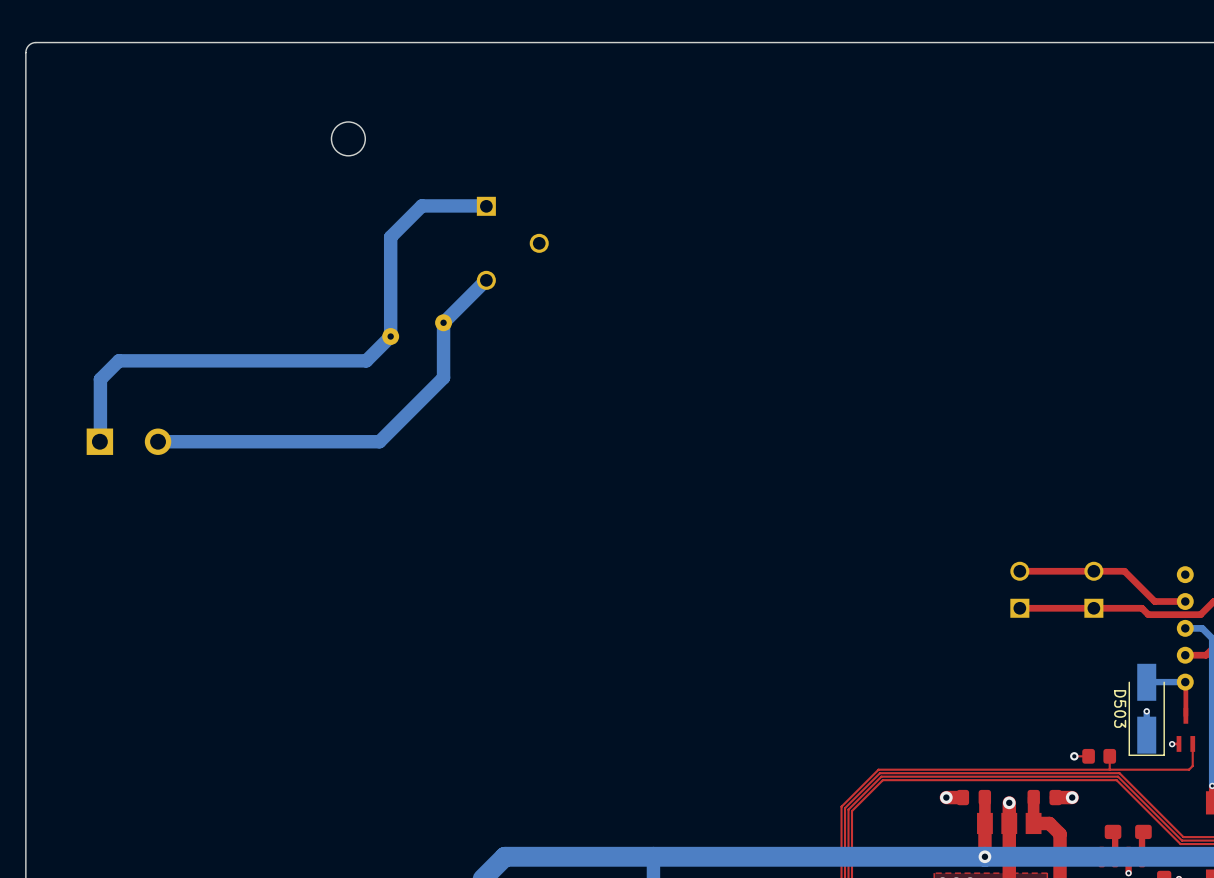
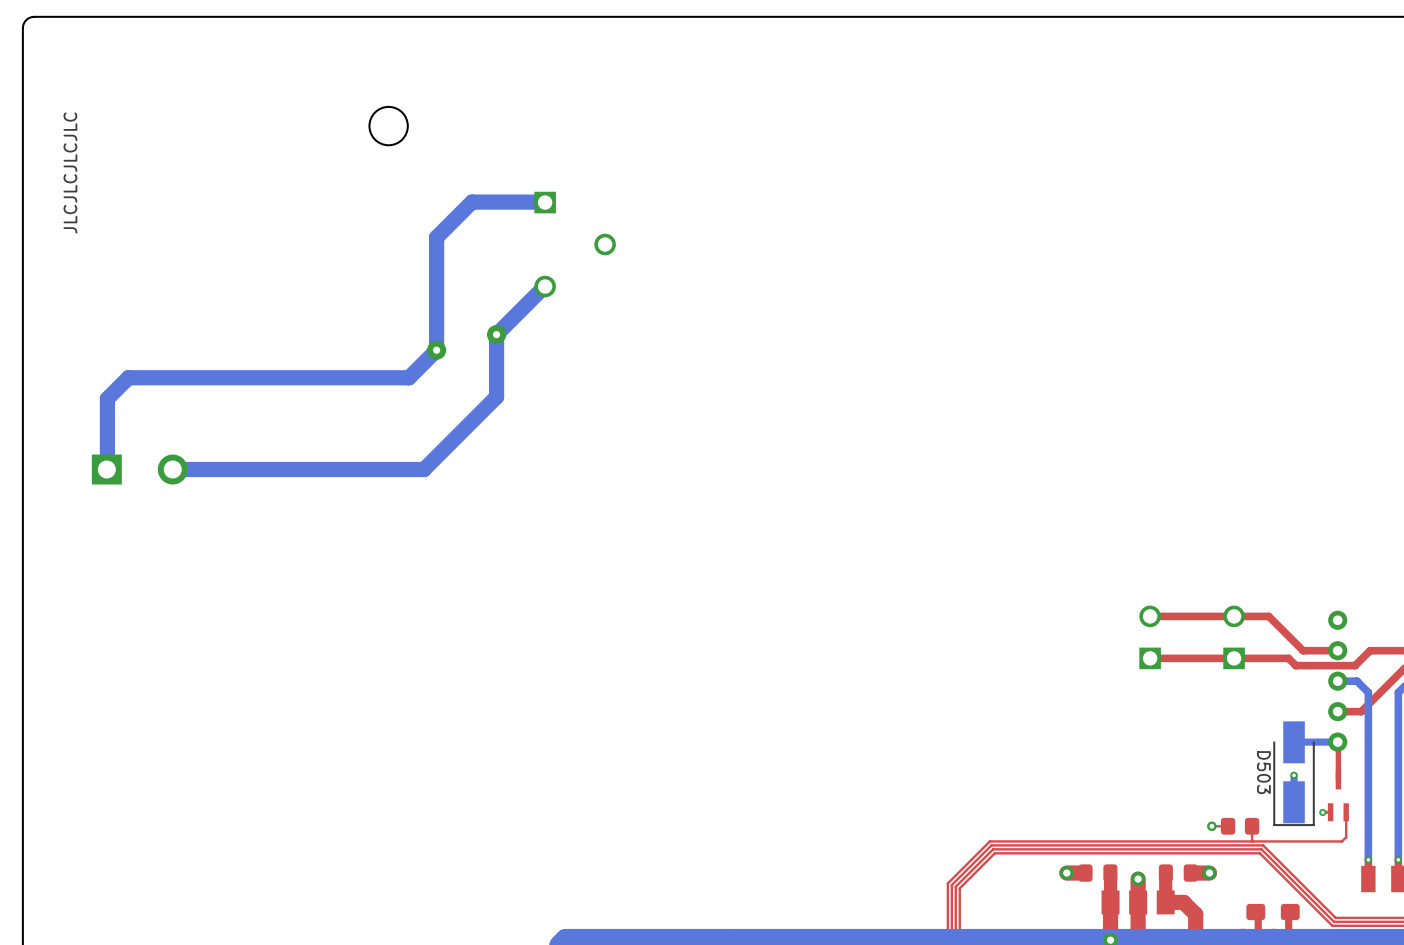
text: none -> JLCJLCJLCJLC (70, 173)

